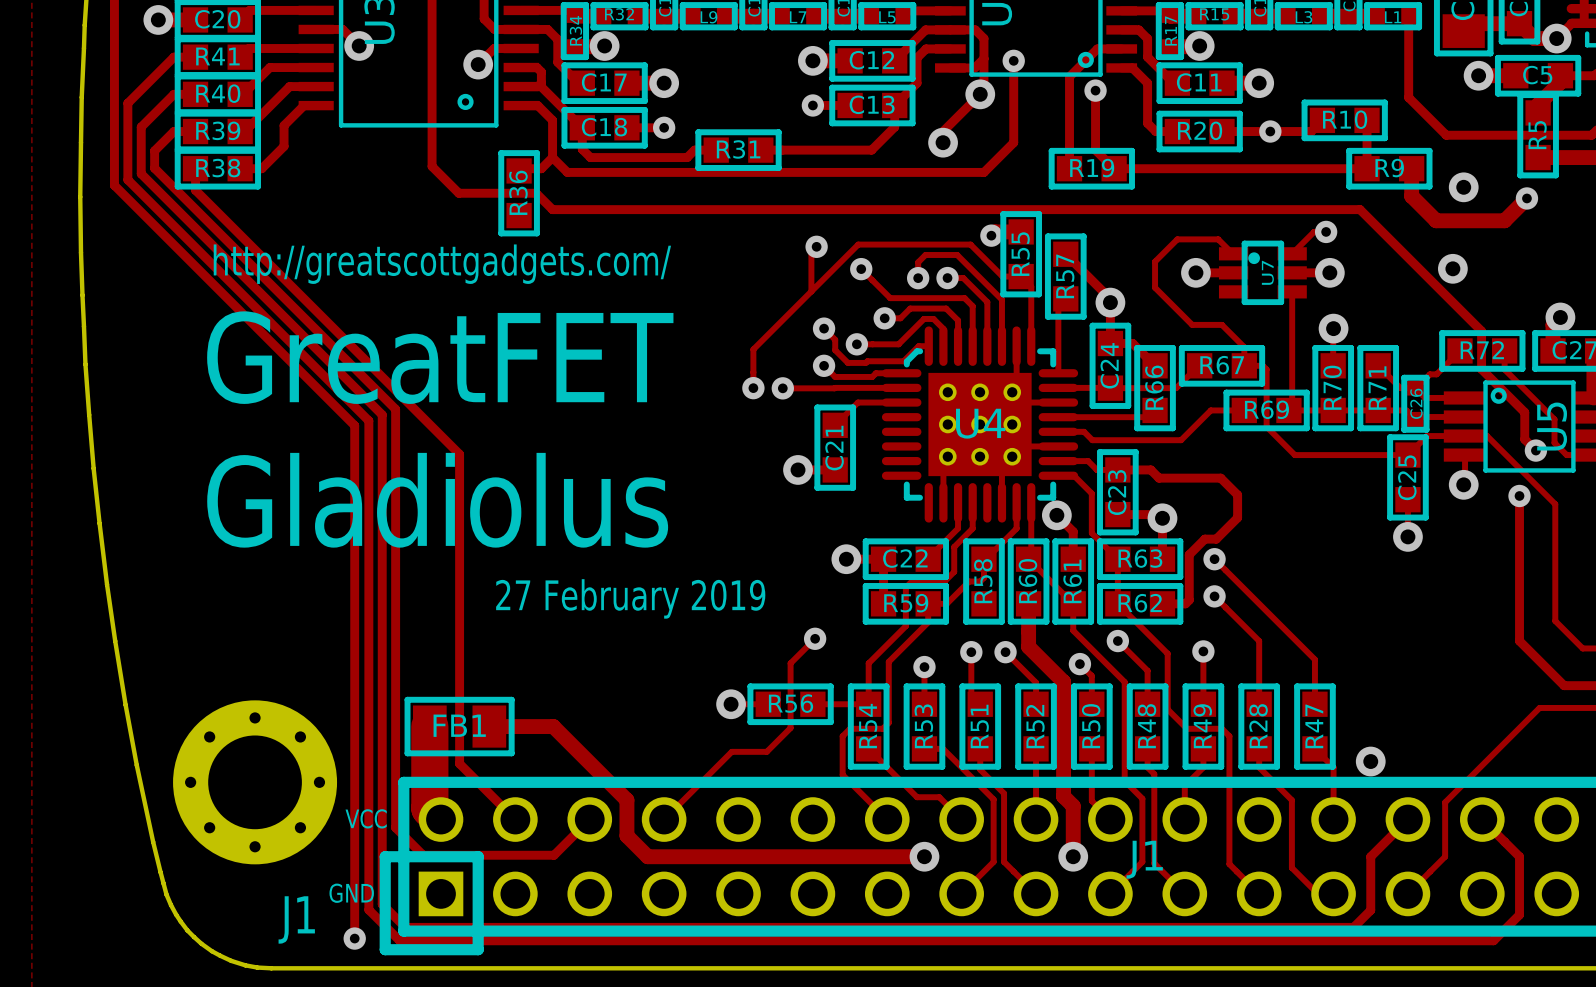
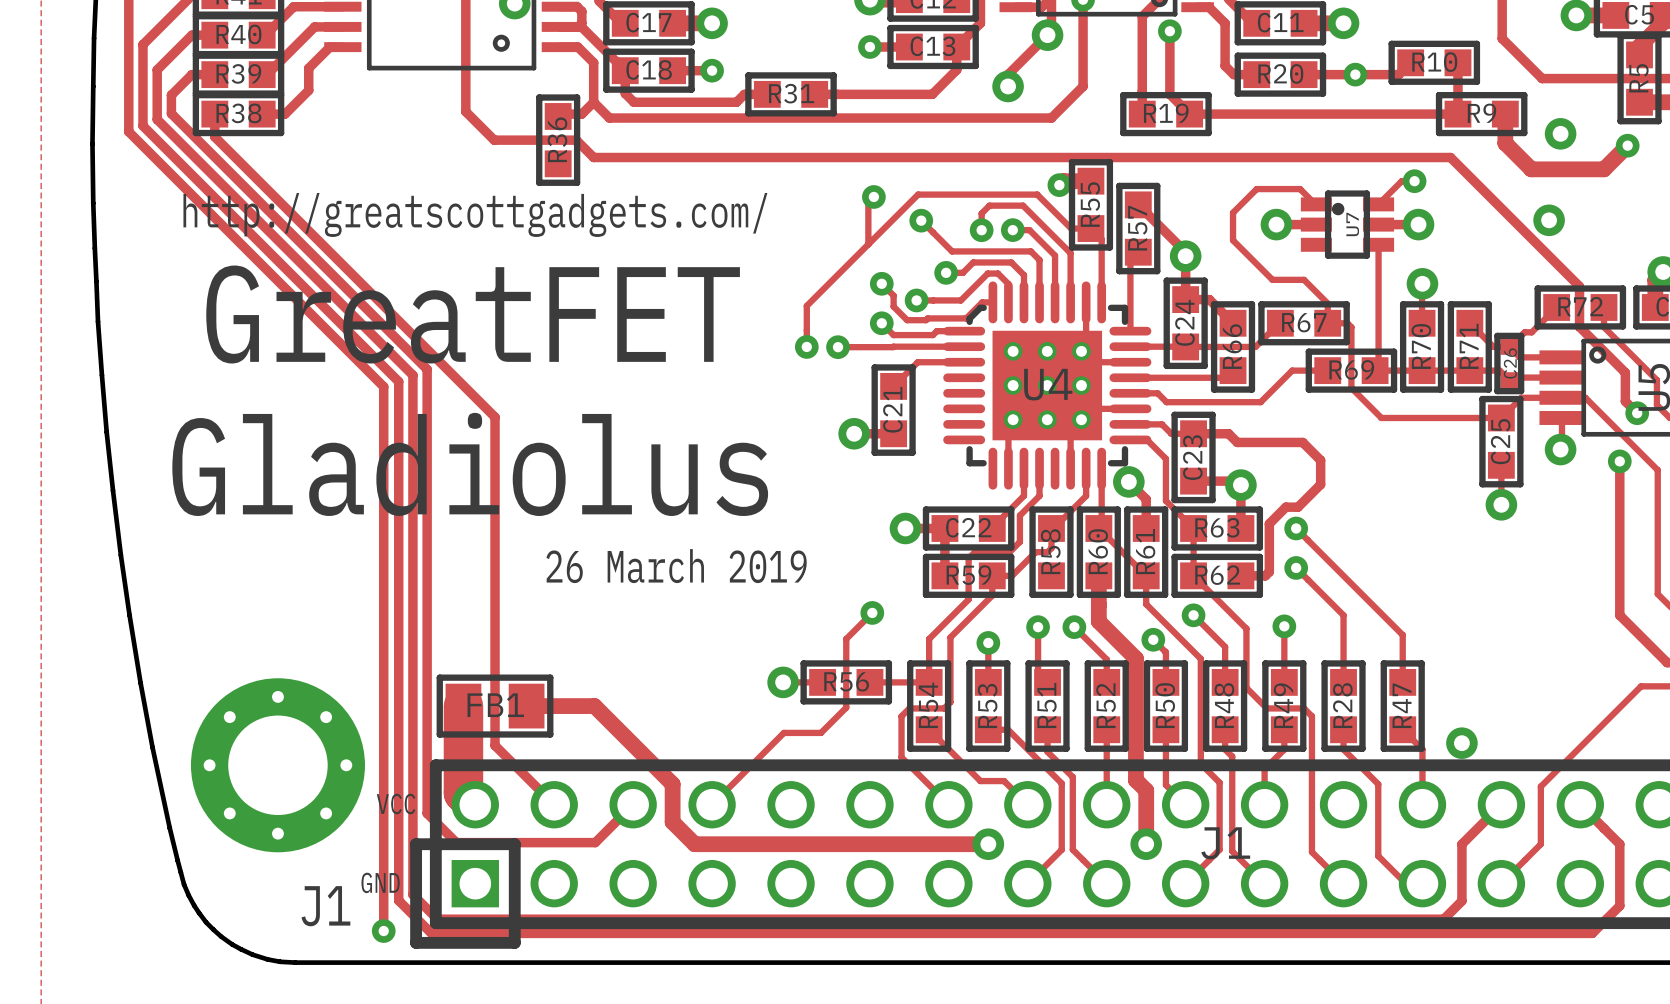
text: 27 February 2019 (630, 598) -> 26 March 2019 (676, 566)

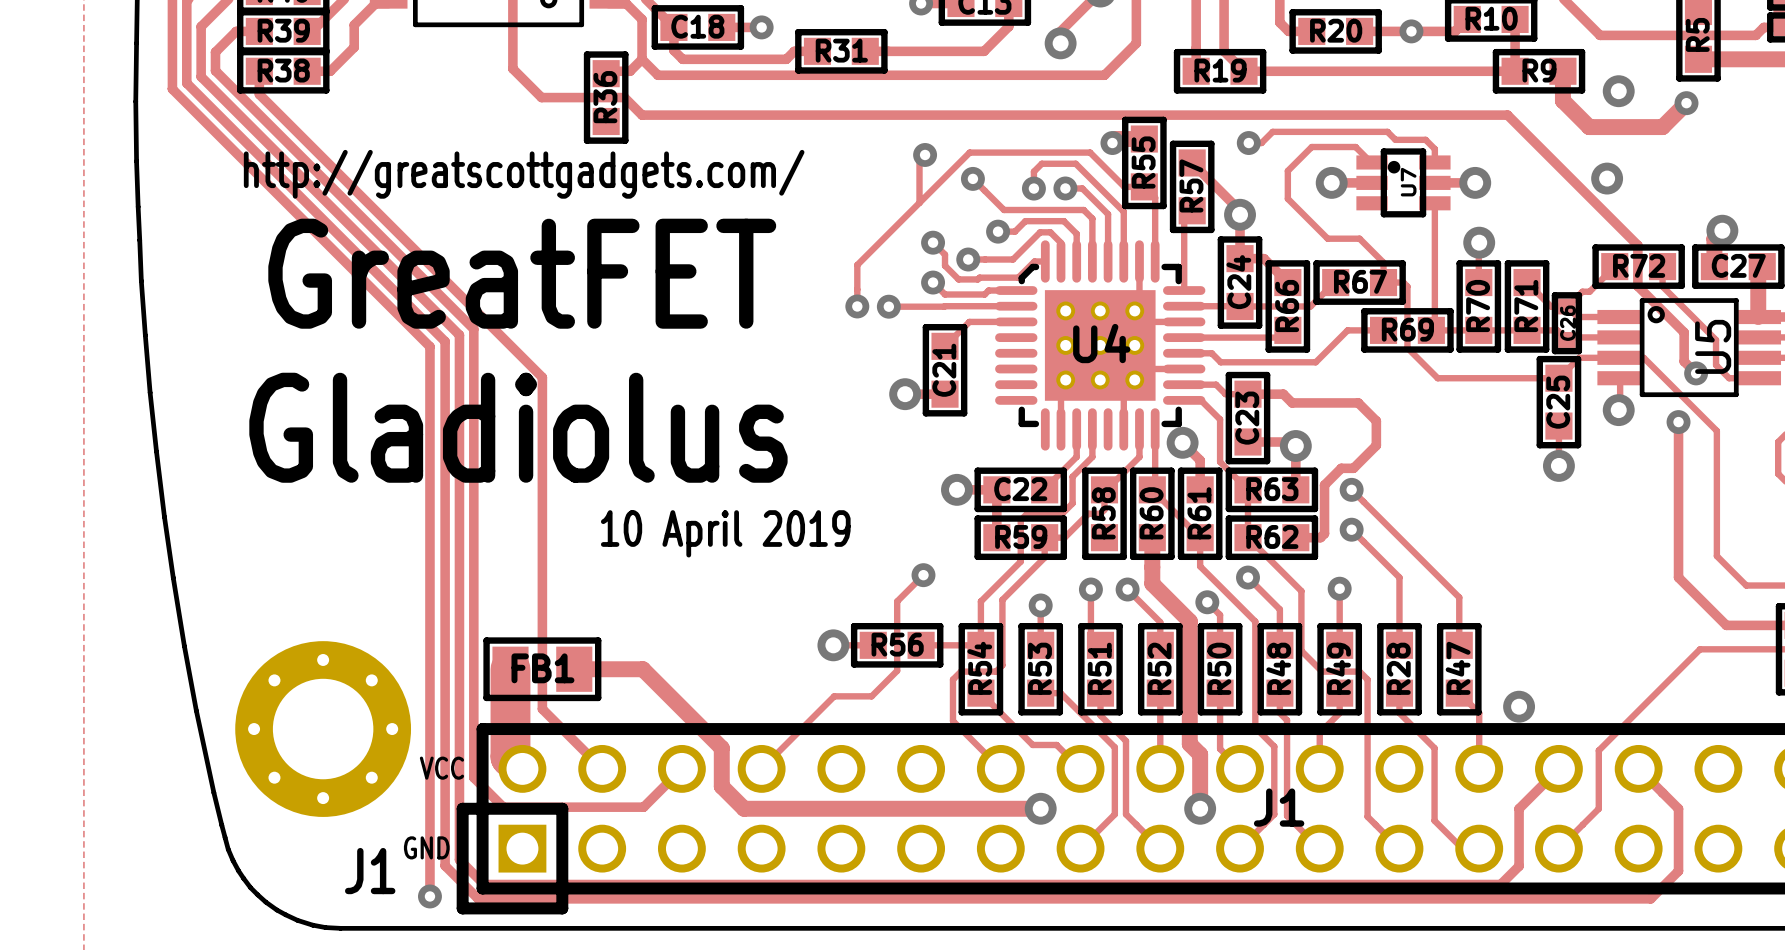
track: (1414, 181) (1401, 181) (1378, 204) -> (1248, 143) (1261, 143) (1272, 131) (1387, 131) (1395, 139) (1425, 139) (1434, 149) (1434, 162)
via: (1414, 181) -> none
via: none -> (1248, 143)
text: 26 March 2019 (676, 566) -> 10 April 2019 (725, 533)

